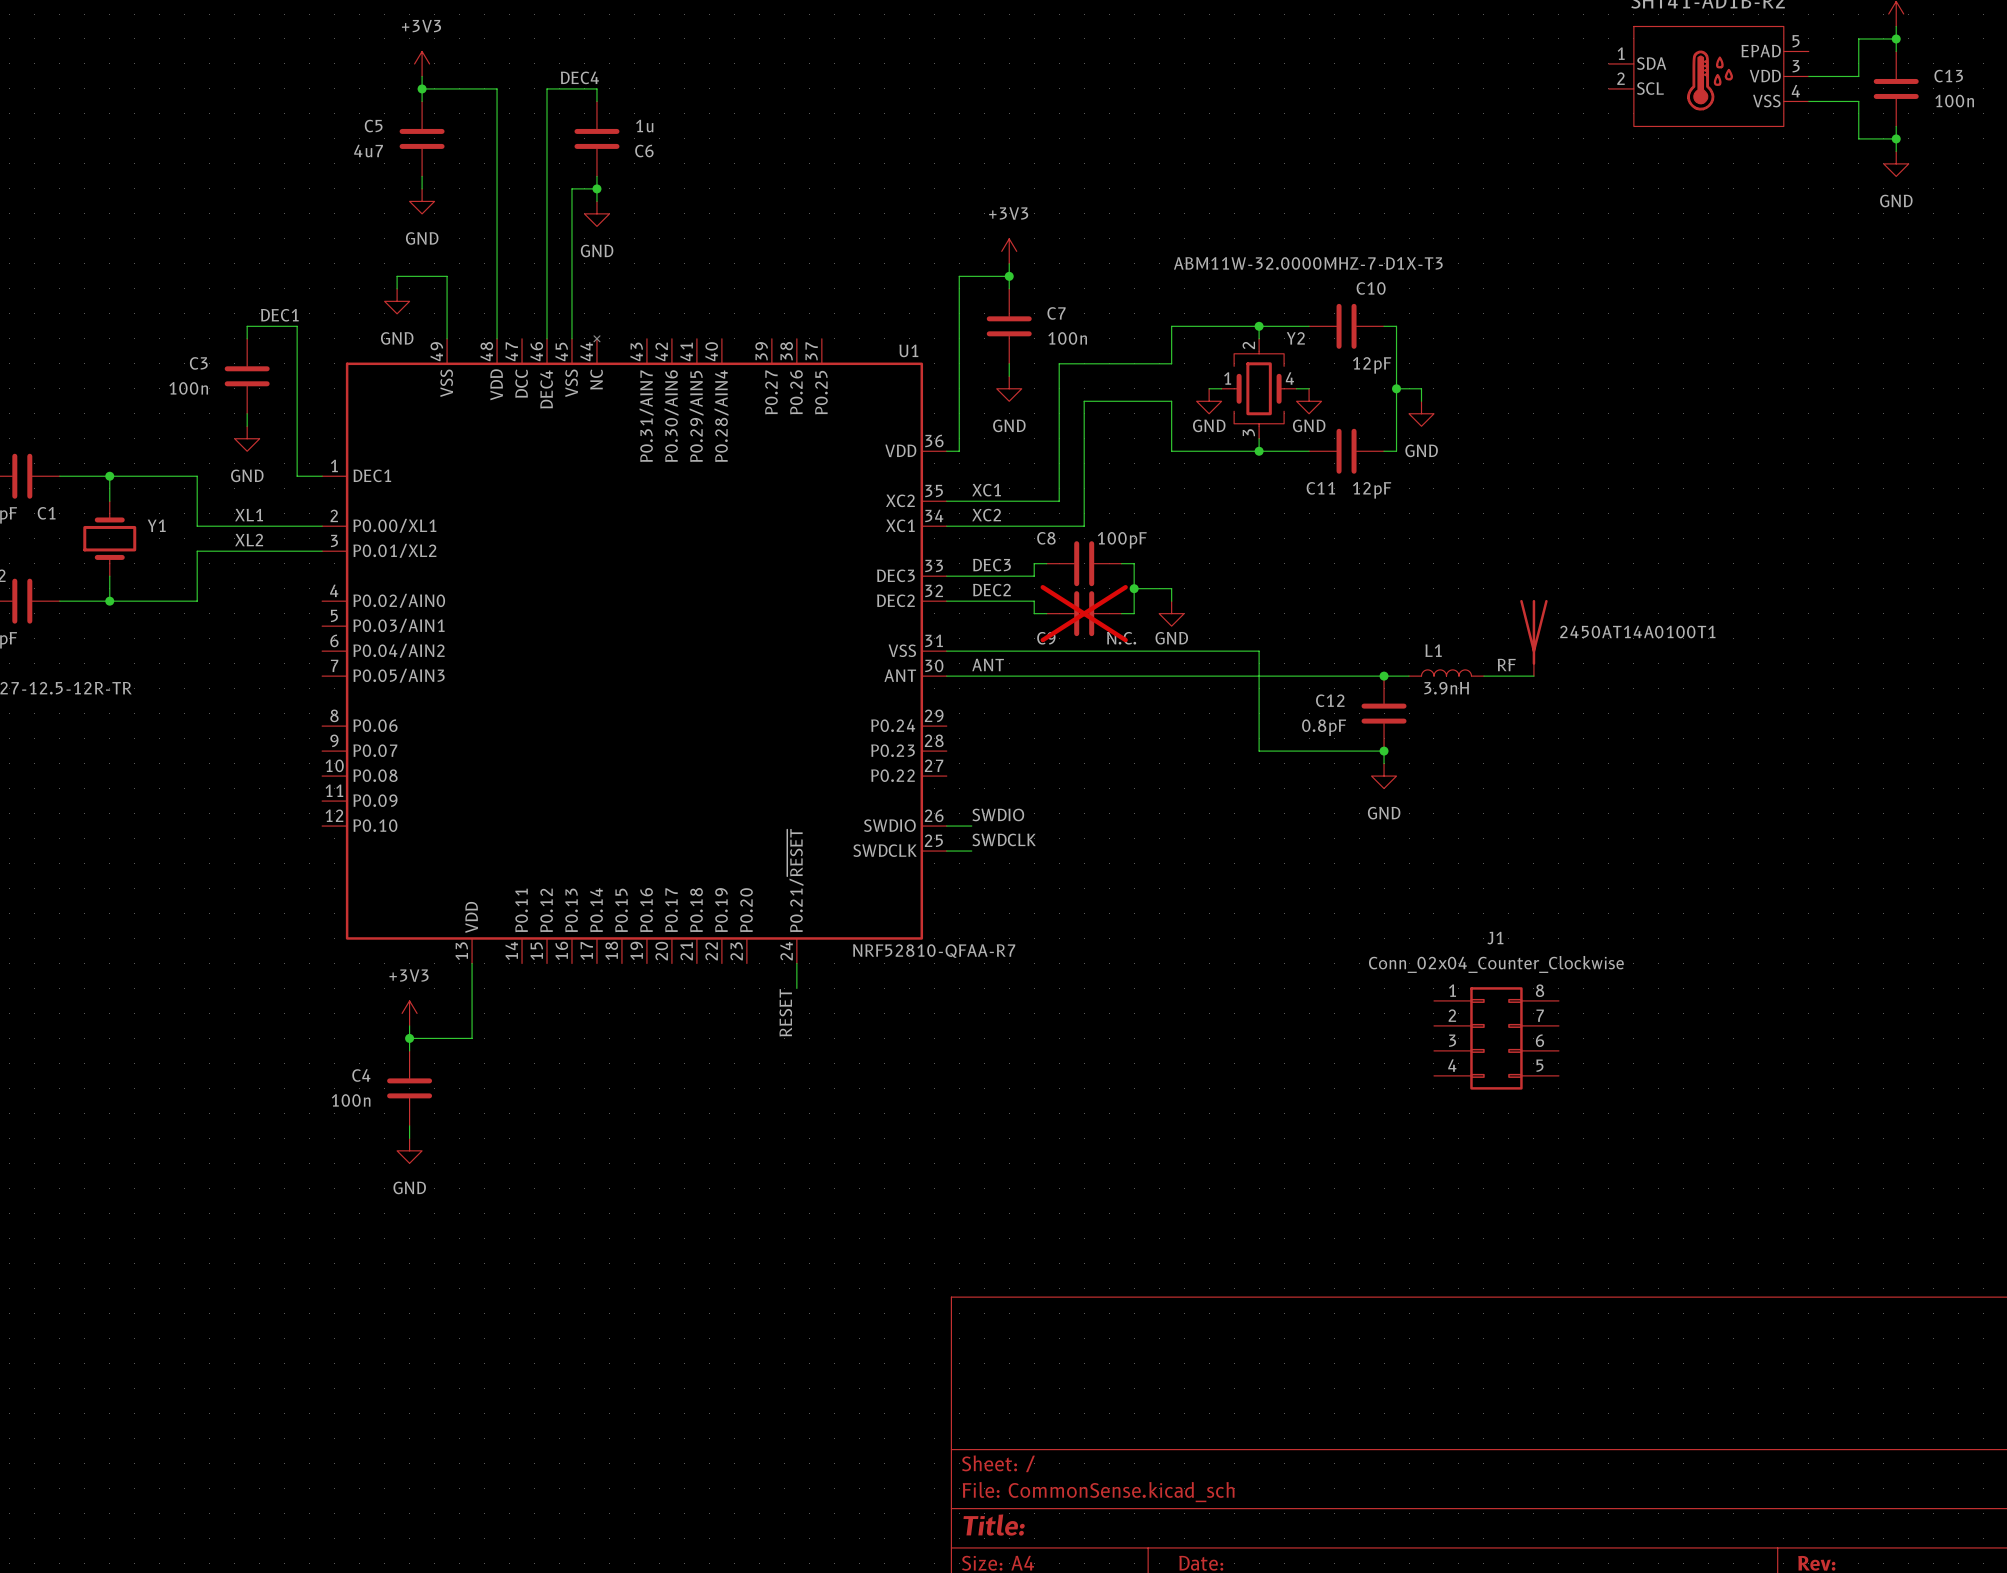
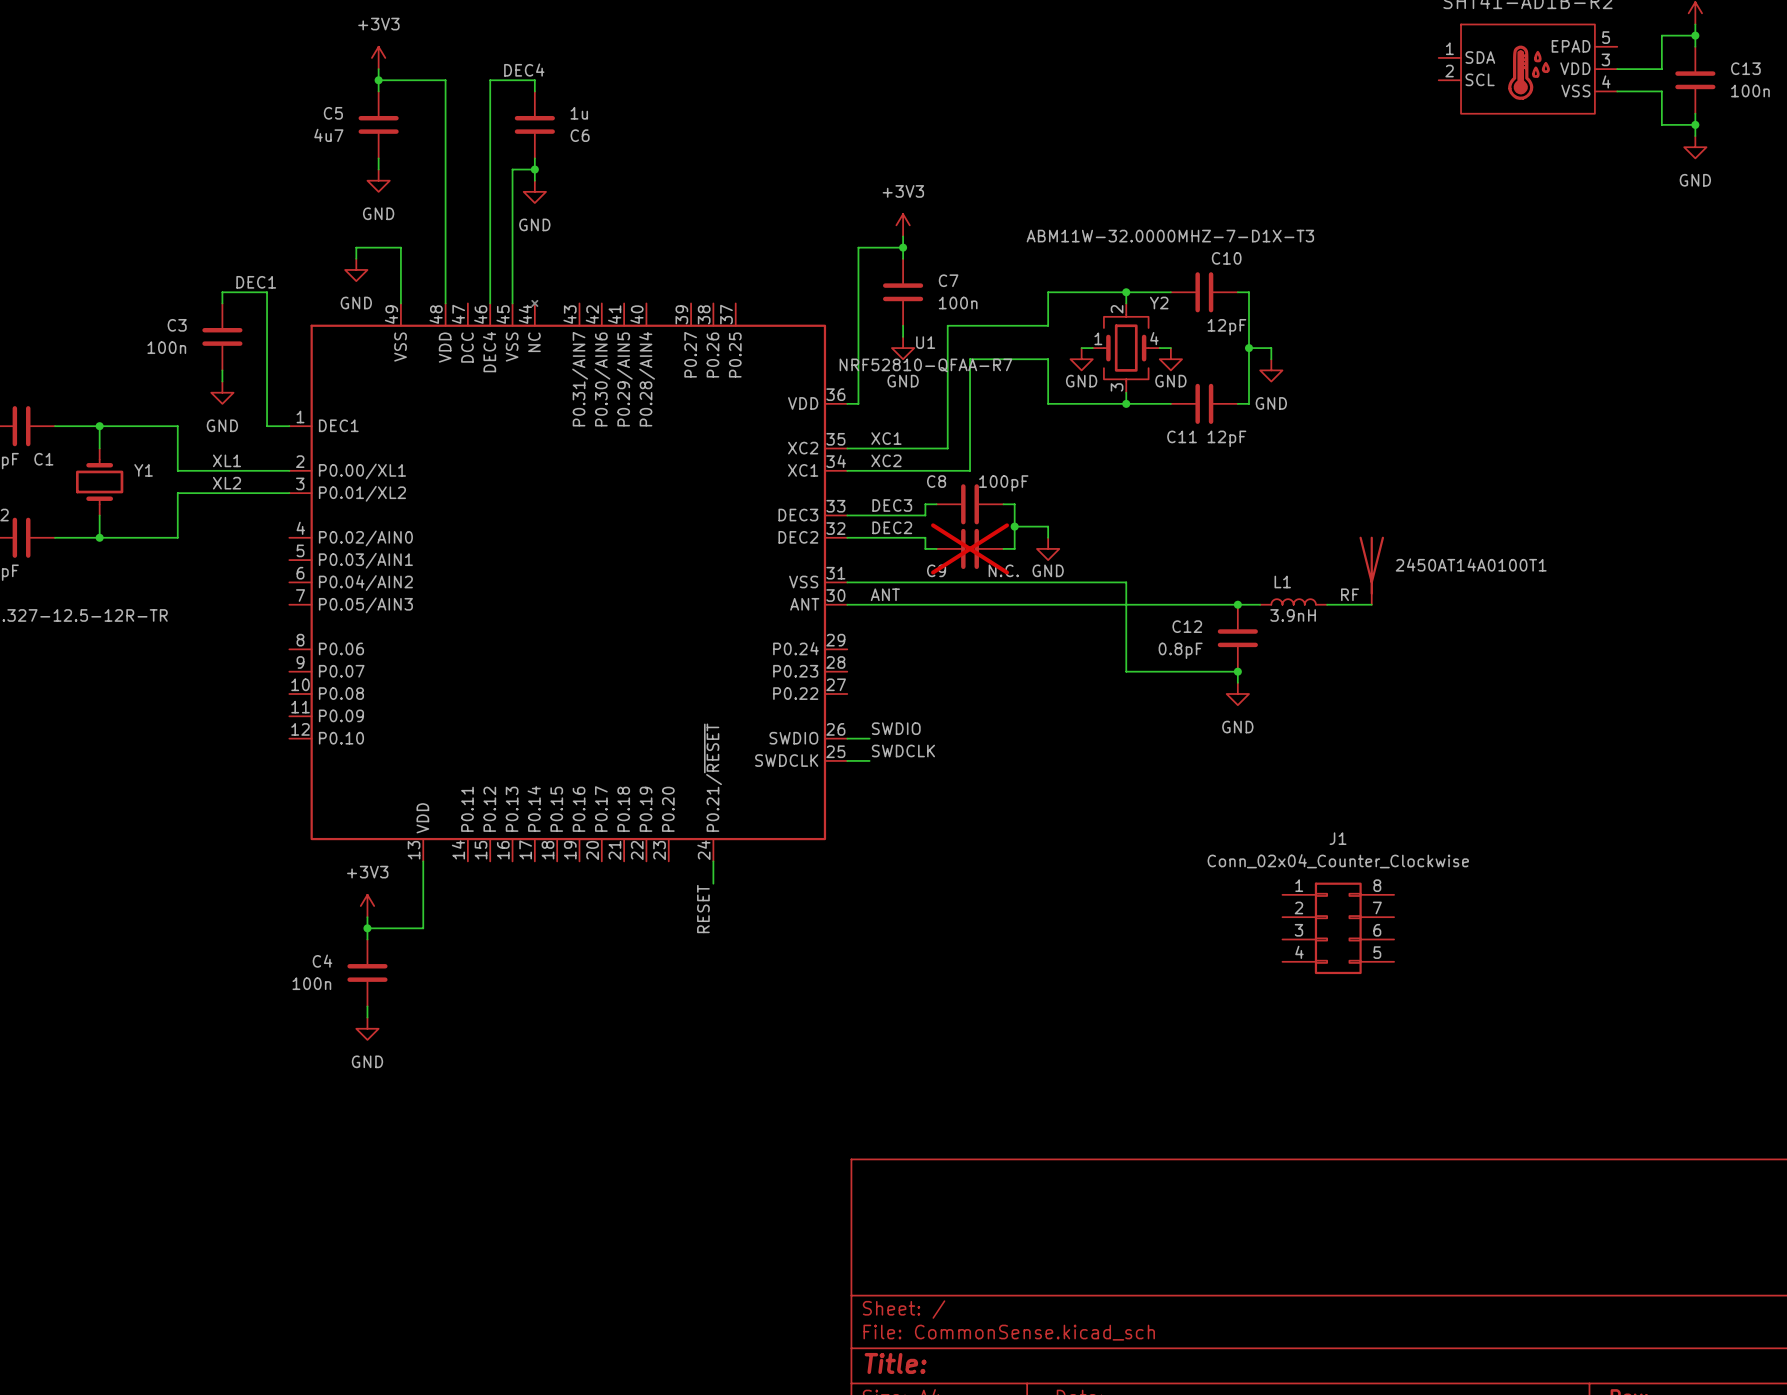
U1 name position: U1 (908, 350) -> U1 (925, 342)
U1 value position: NRF52810-QFAA-R7 (934, 951) -> NRF52810-QFAA-R7 (925, 365)

